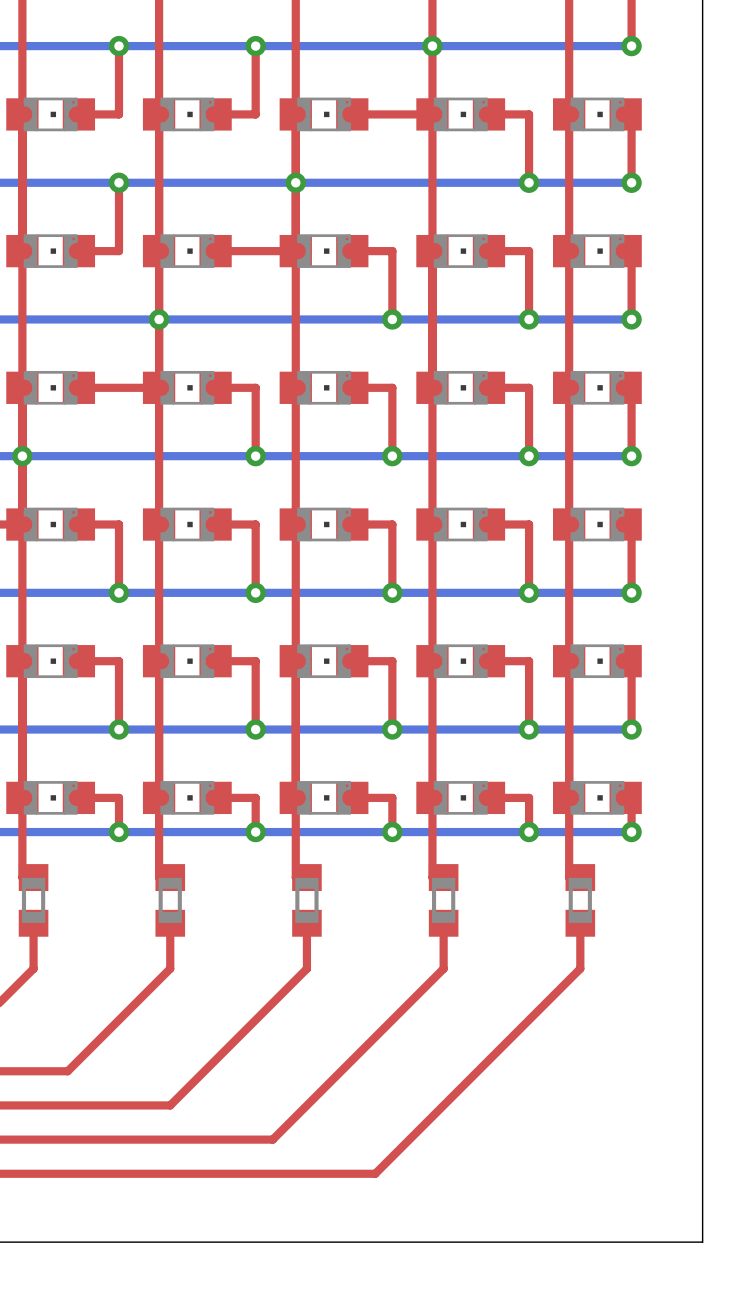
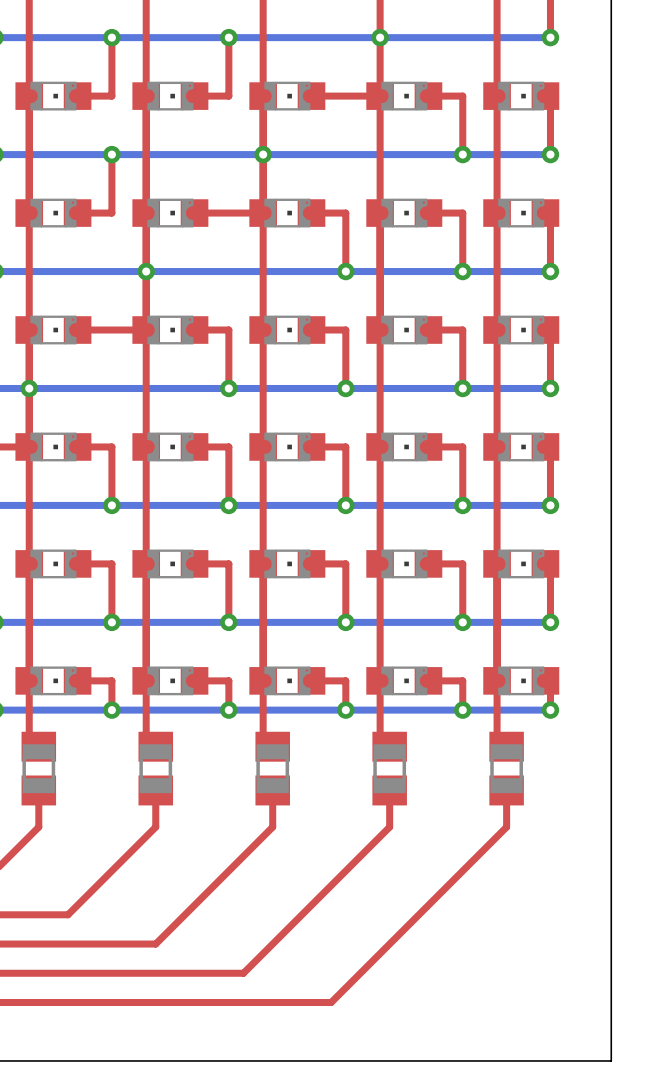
part footprint: [18, 864, 49, 937] -> [21, 731, 57, 806]
part footprint: [155, 864, 186, 937] -> [138, 731, 174, 806]
part footprint: [292, 864, 322, 937] -> [255, 731, 290, 806]
part footprint: [428, 864, 459, 937] -> [372, 731, 407, 806]
part footprint: [565, 864, 596, 937] -> [489, 731, 524, 806]

